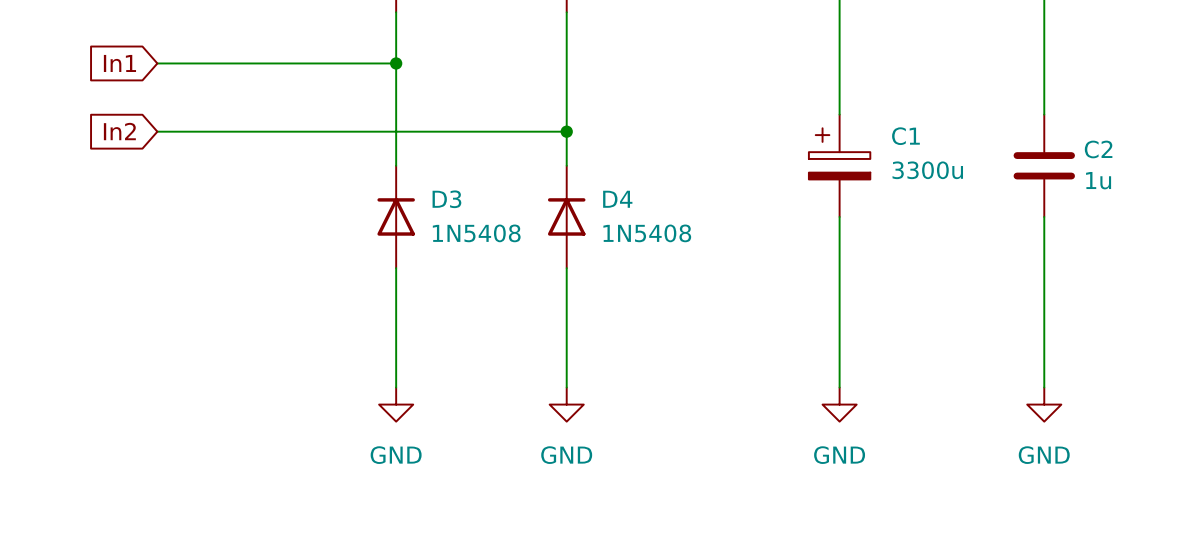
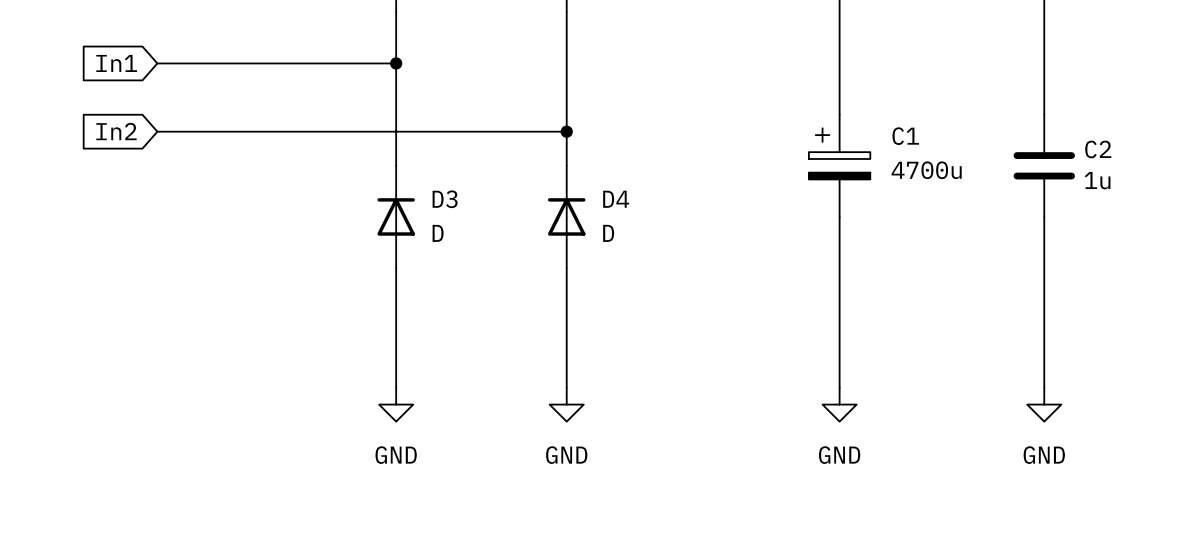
C1 value: 3300u (927, 170) -> 4700u (926, 170)
D3 value: 1N5408 (476, 233) -> D (438, 233)
D4 value: 1N5408 (647, 233) -> D (608, 233)

